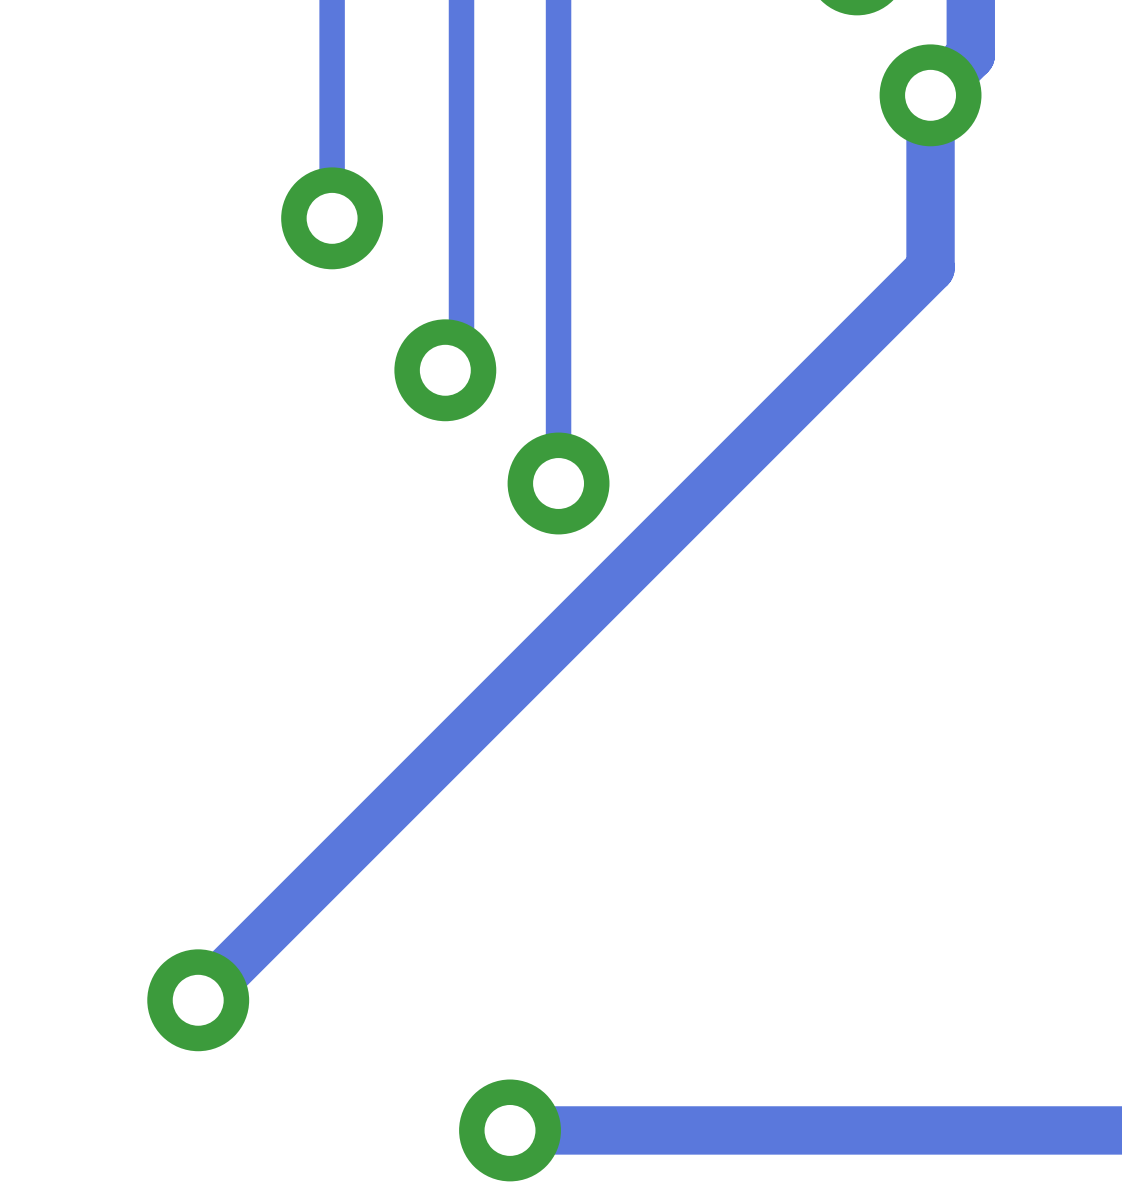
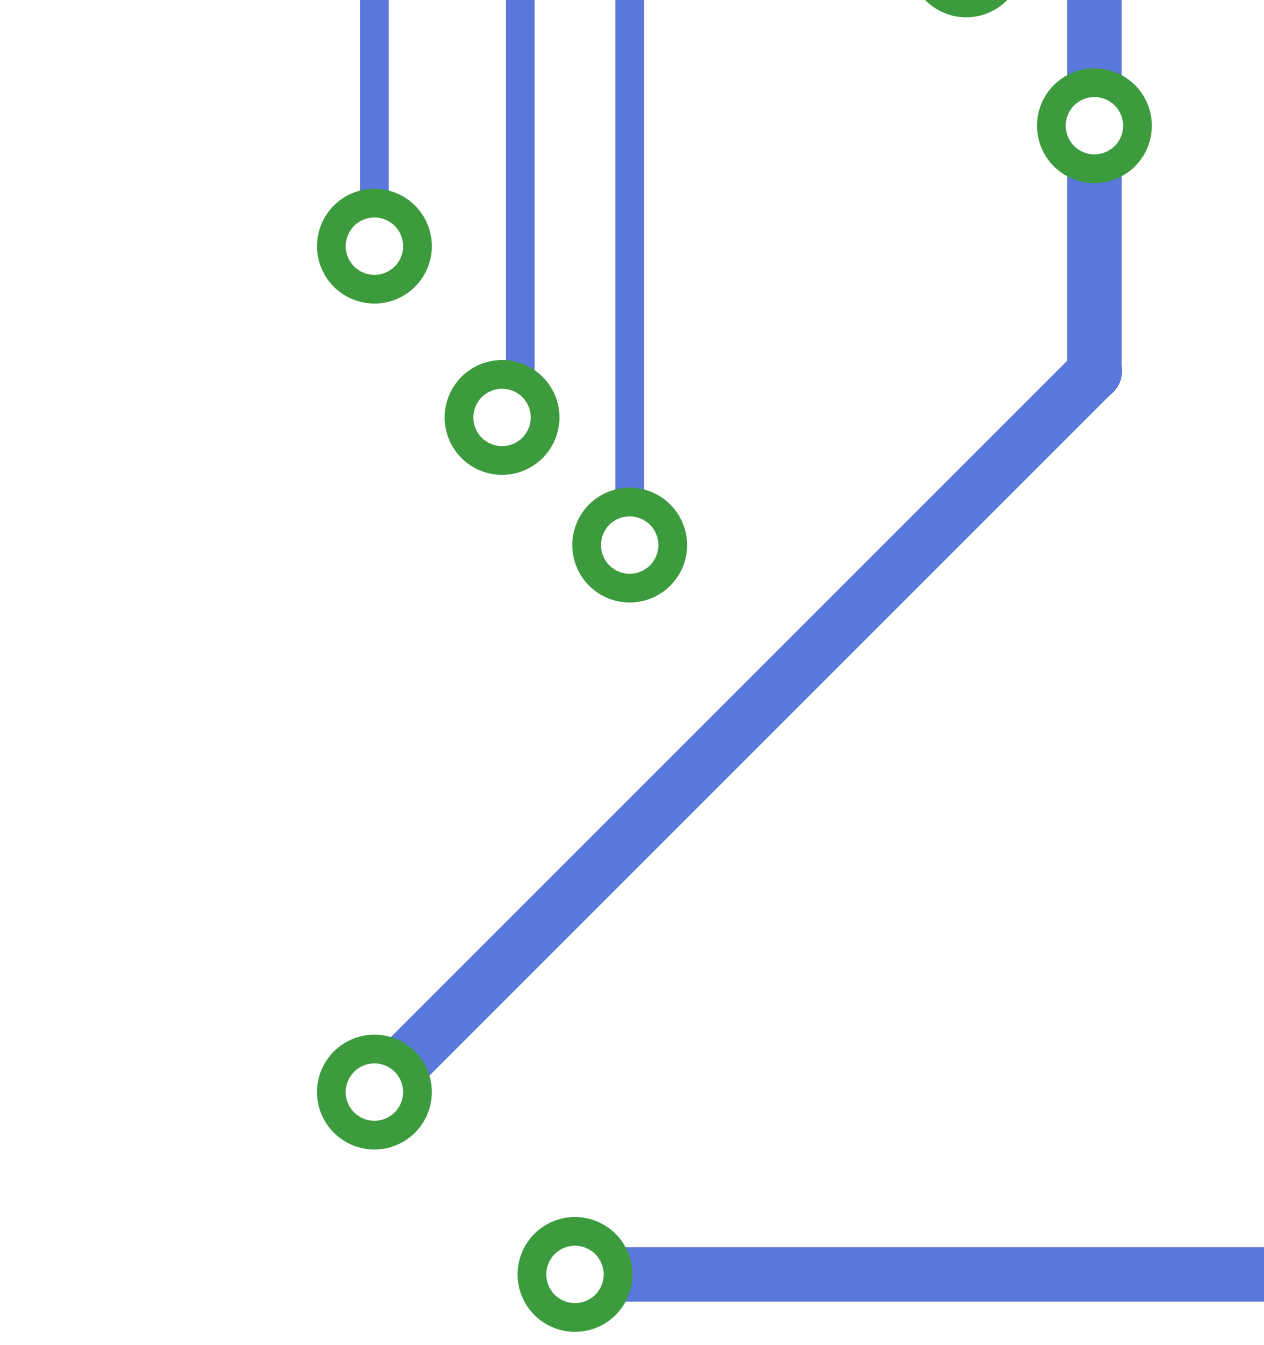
track: (970, 55) (930, 95) (930, 267) (198, 1000) -> (1094, 62) (1094, 372) (374, 1092)
via position: (930, 95) -> (1094, 125)
via position: (198, 1000) -> (374, 1092)

